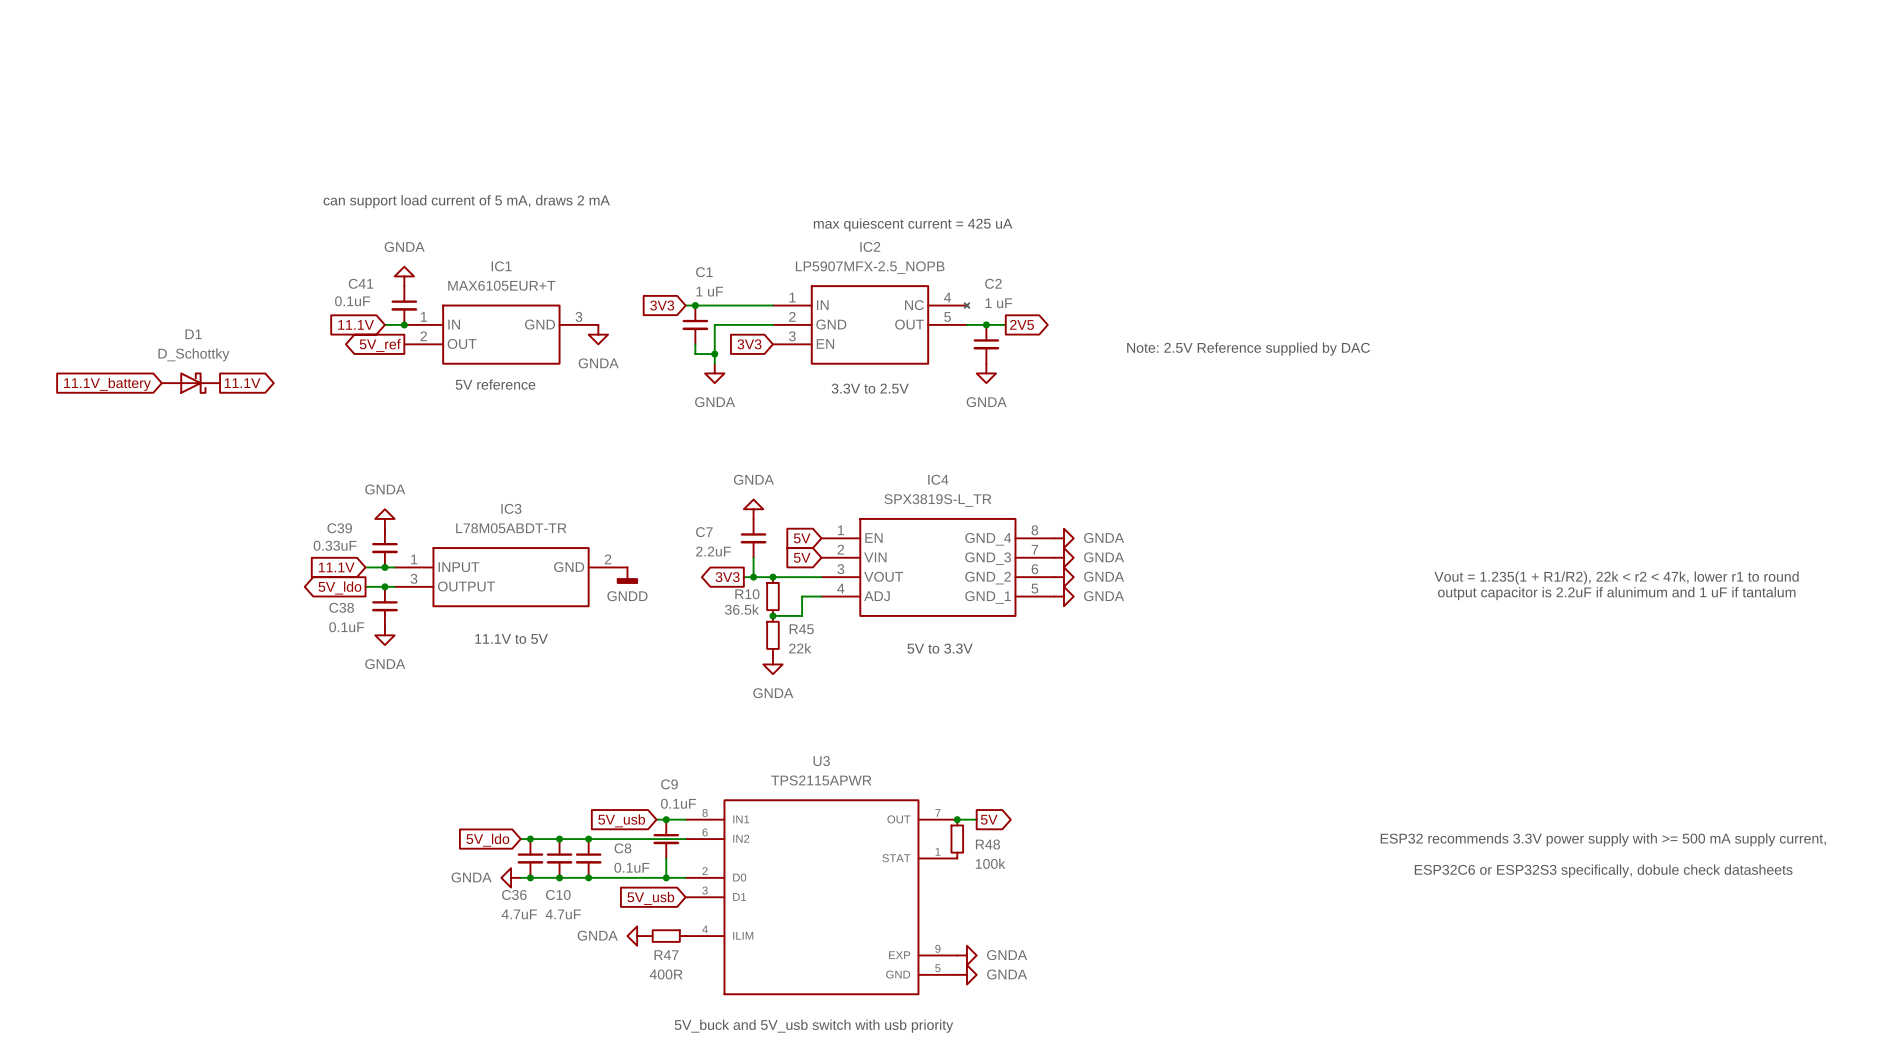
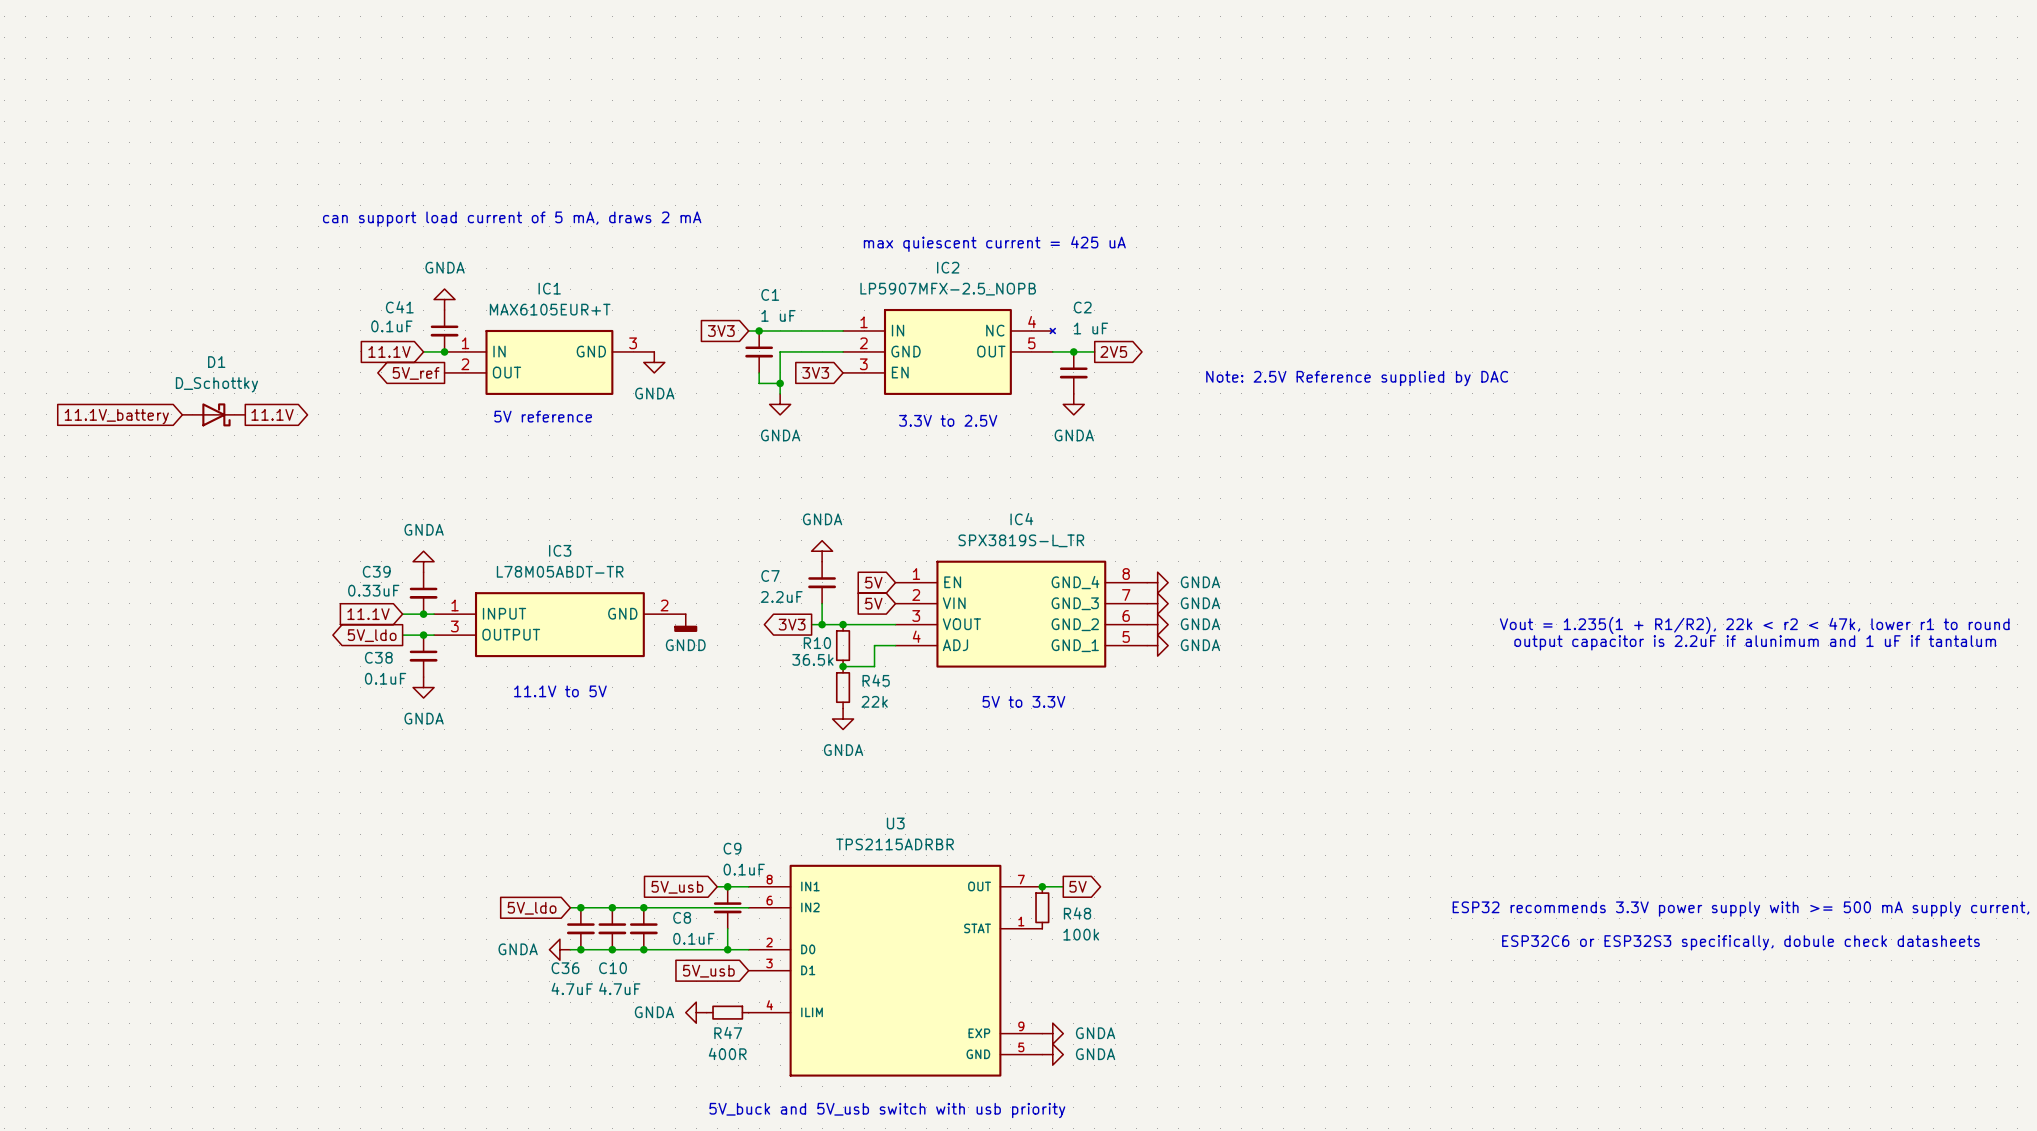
U3 value: TPS2115APWR (821, 780) -> TPS2115ADRBR (894, 844)

